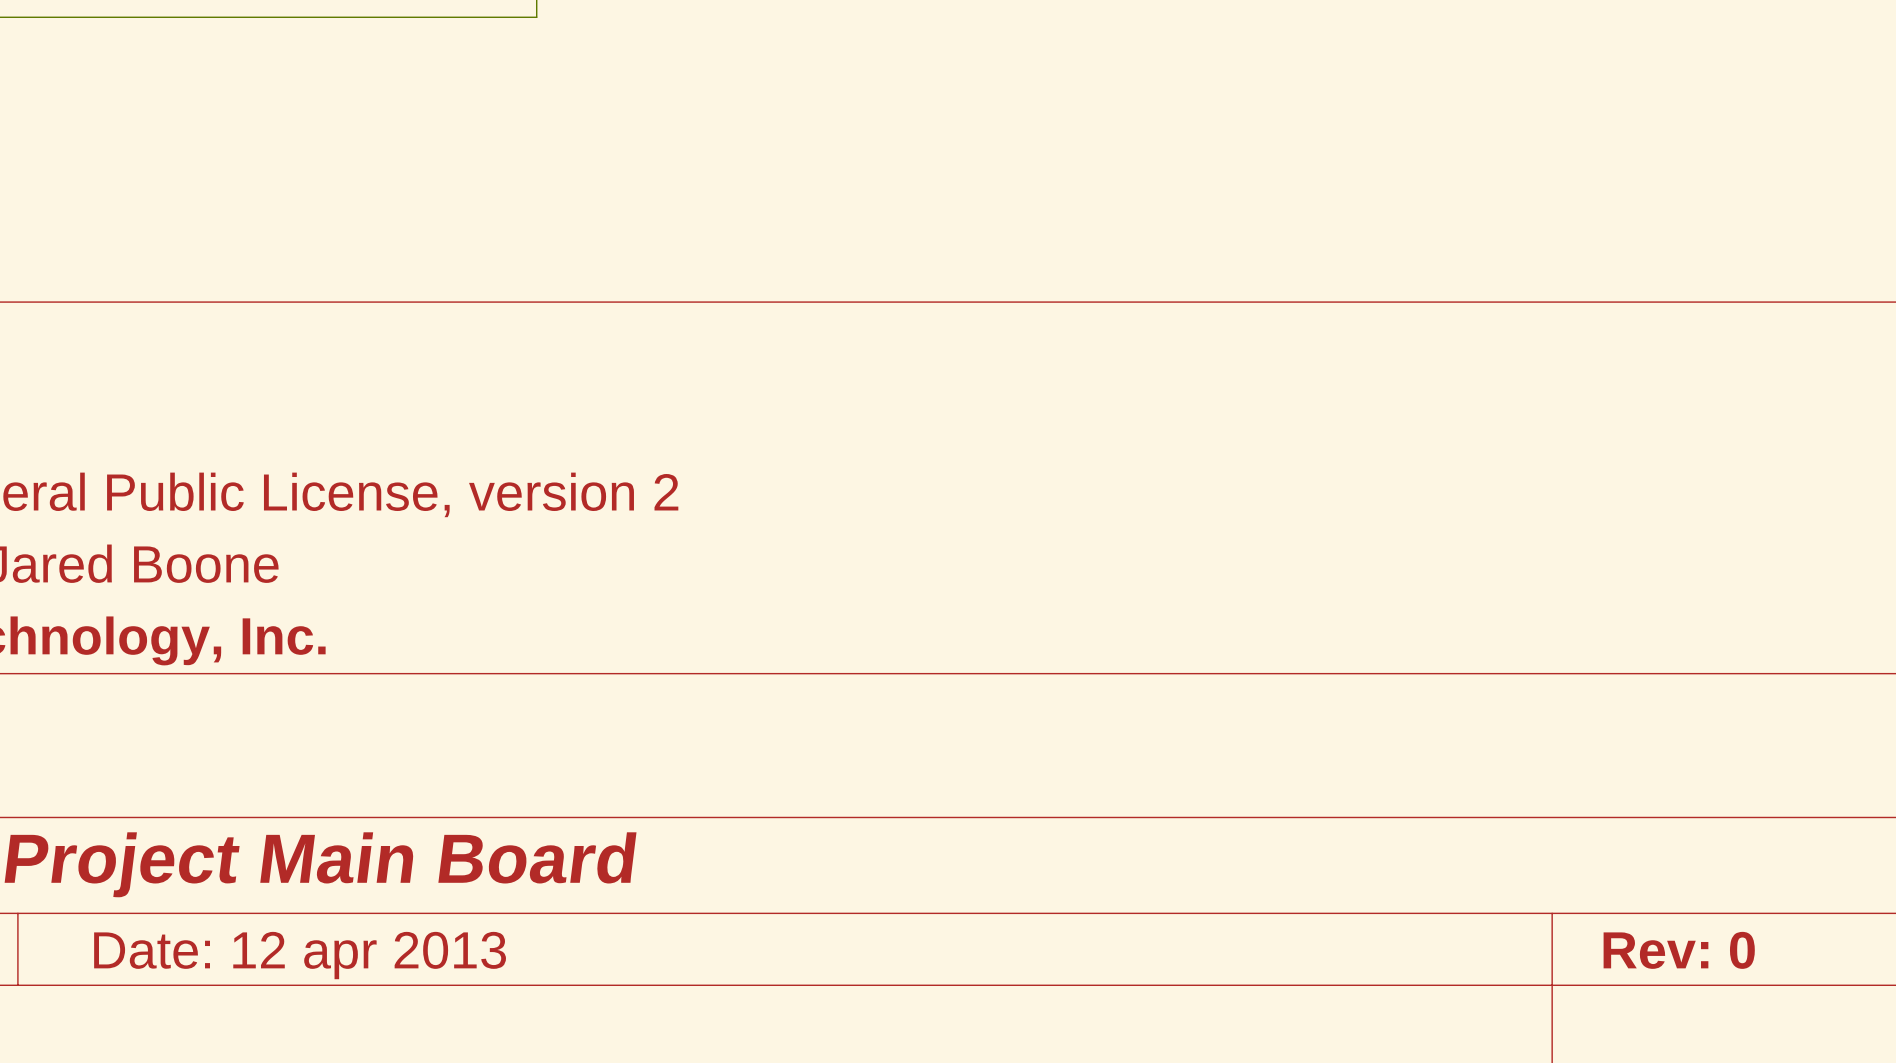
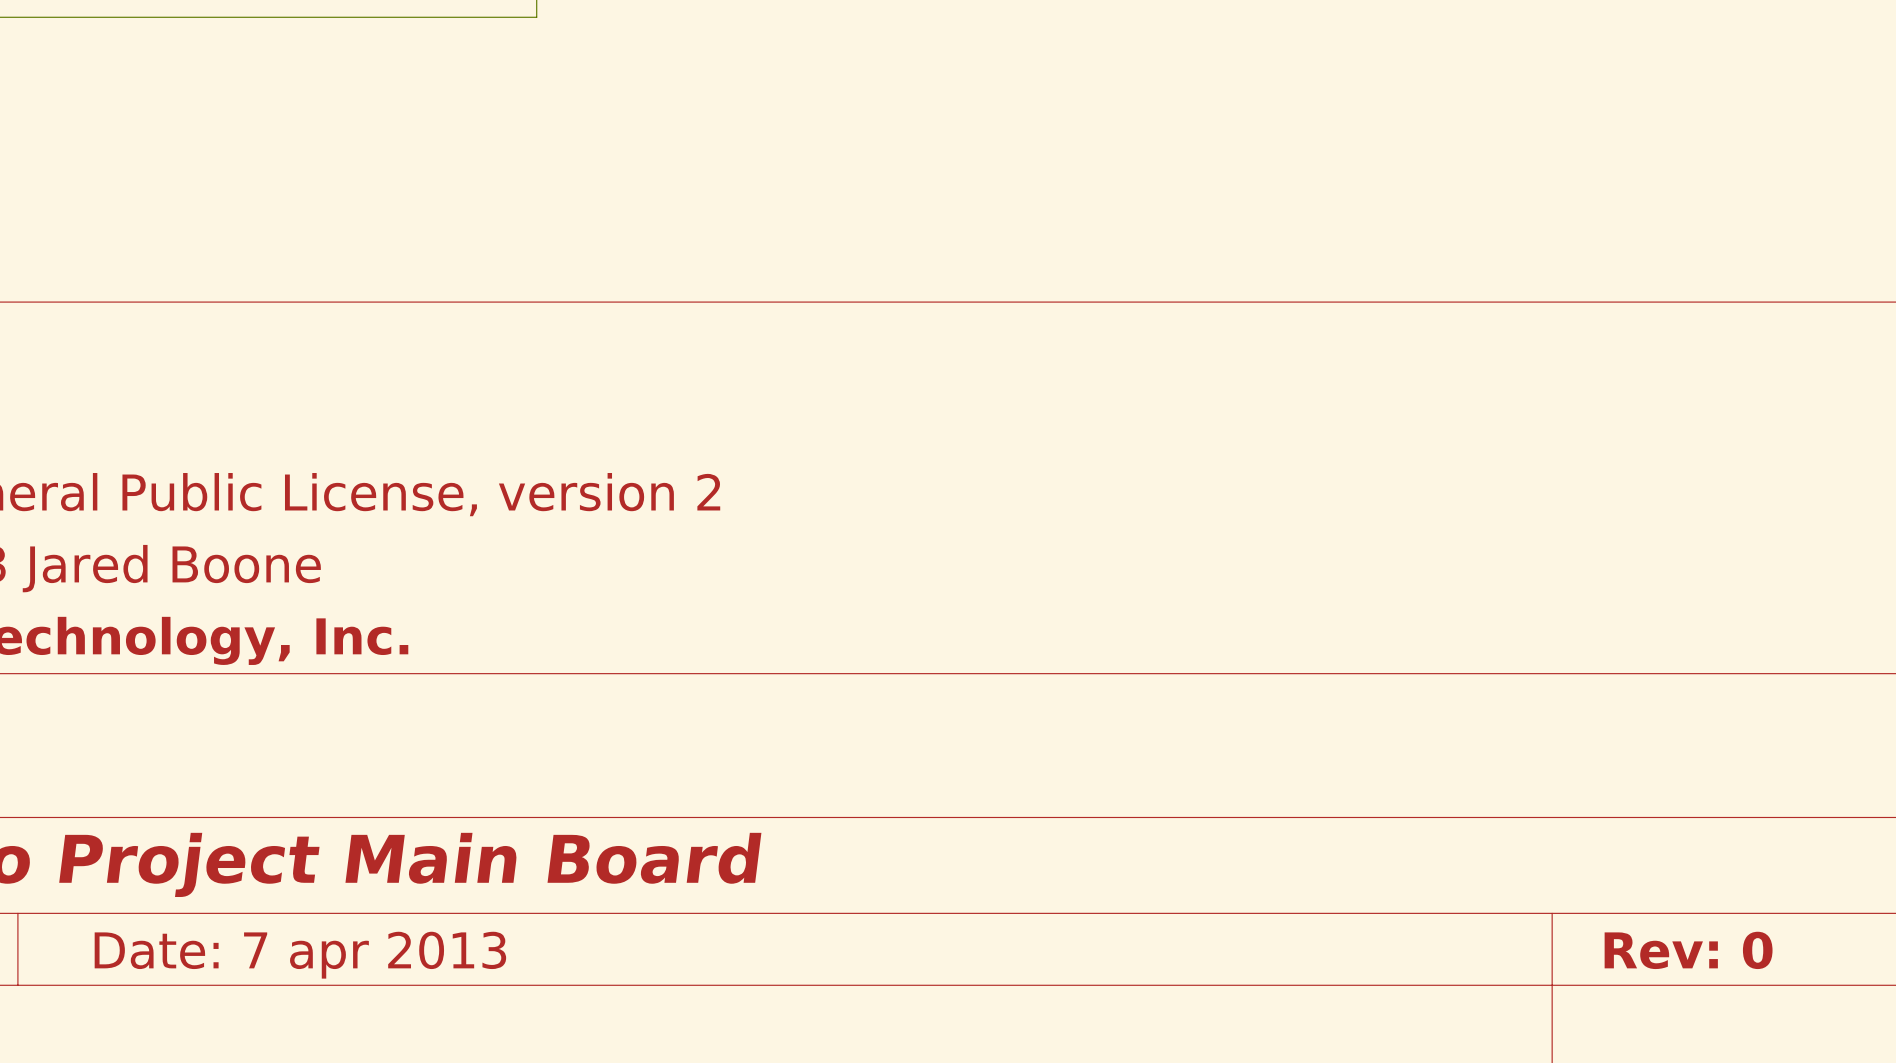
title block: Date: 12 apr 2013 (300, 955) -> Date: 7 apr 2013 (300, 955)

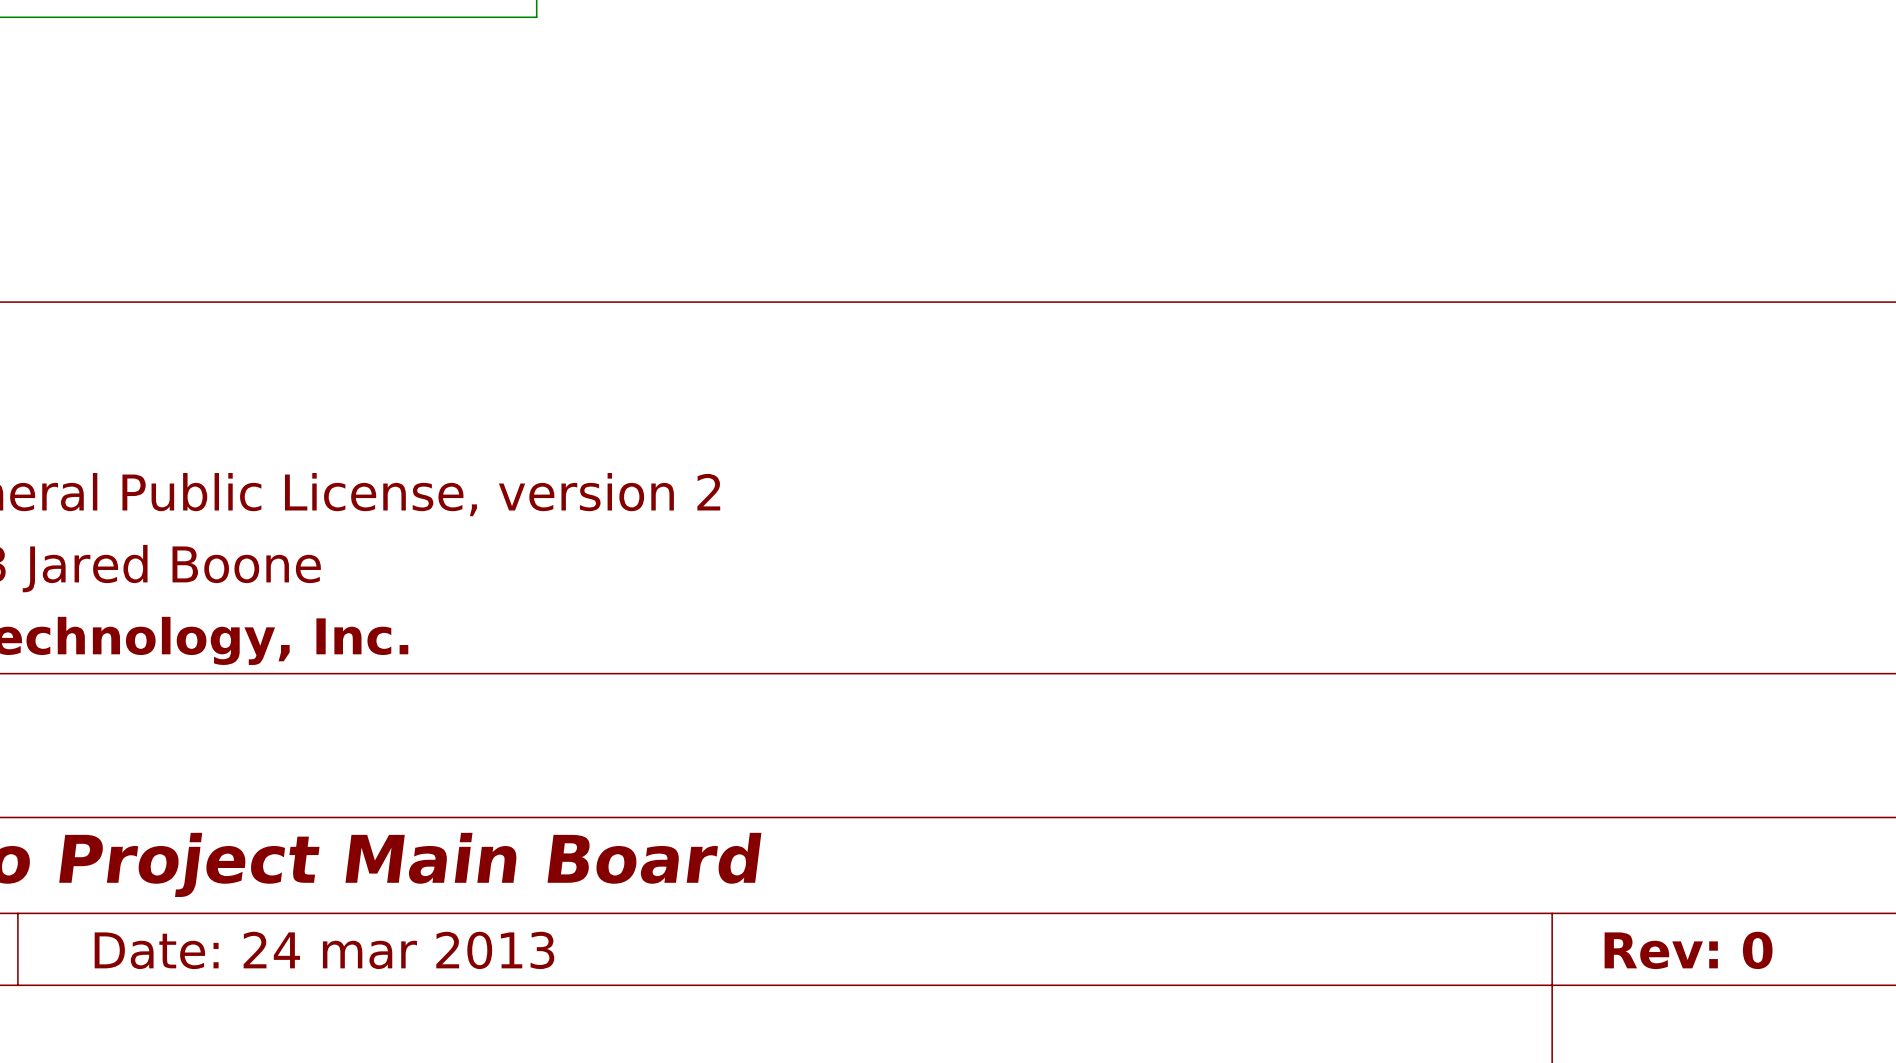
title block: Date: 7 apr 2013 (300, 955) -> Date: 24 mar 2013 (324, 950)

